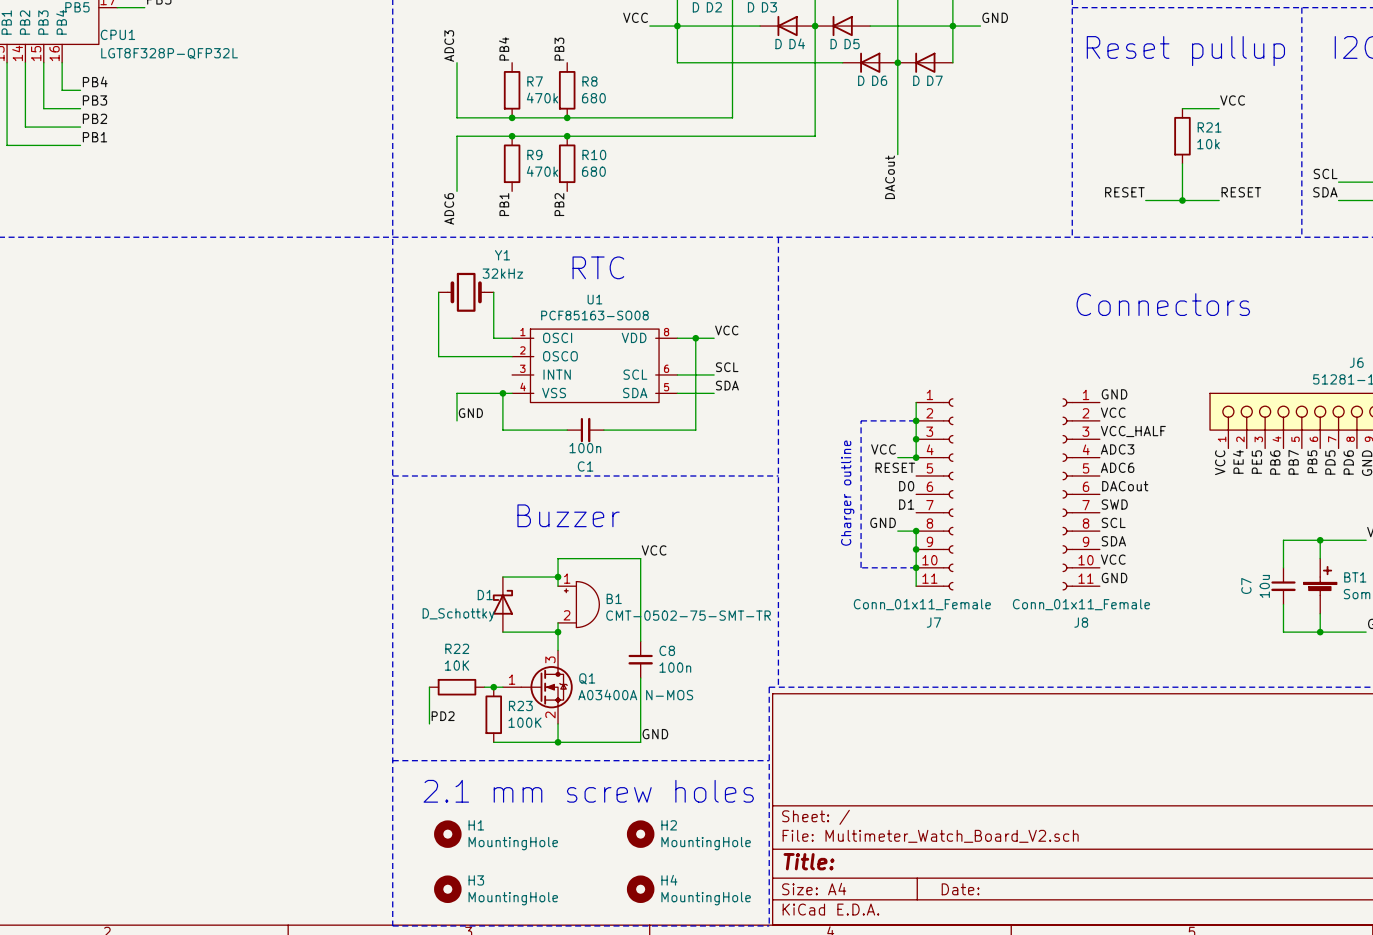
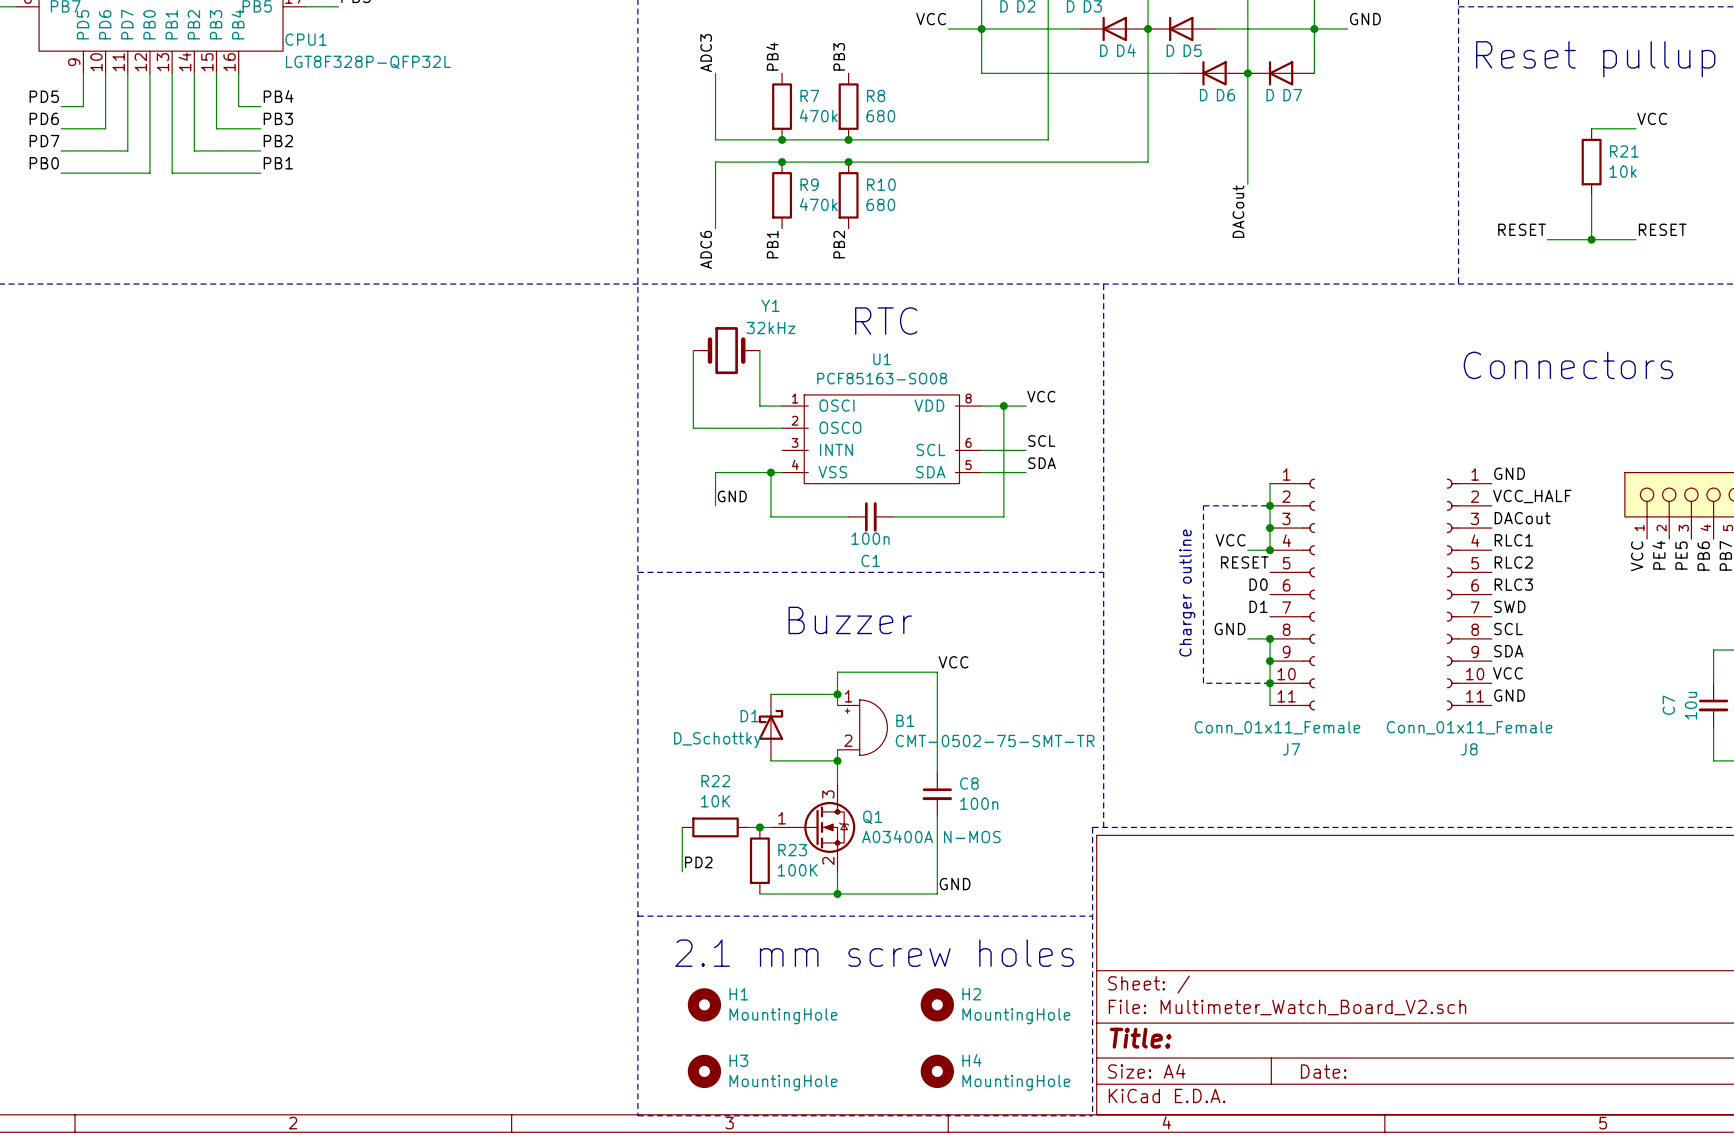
label: VCC (1113, 412) -> VCC_HALF (1532, 496)
label: VCC_HALF (1133, 431) -> DACout (1522, 518)
label: ADC3 (1117, 449) -> RLC1 (1513, 540)
label: ADC6 (1117, 467) -> RLC2 (1513, 562)
label: DACout (1125, 486) -> RLC3 (1513, 584)

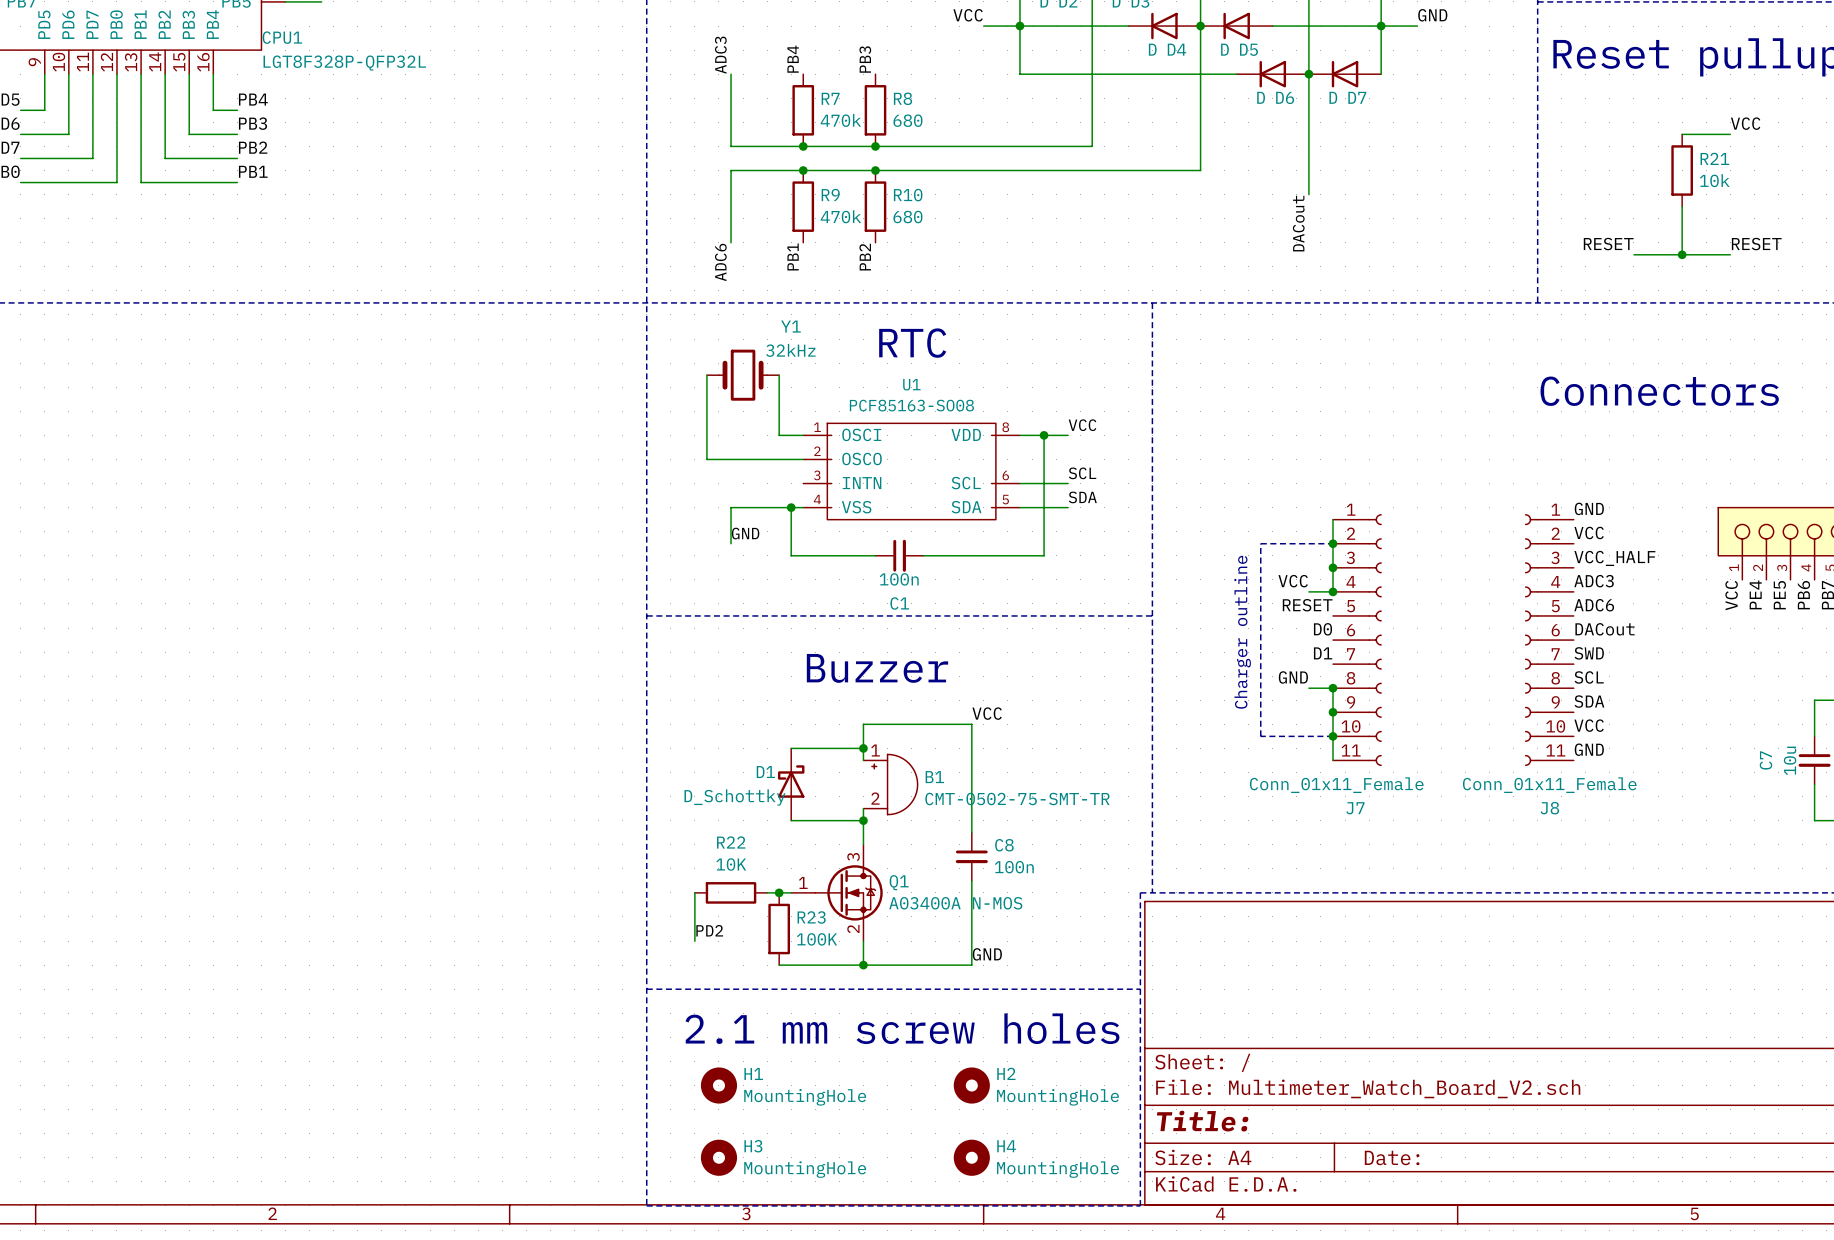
label: VCC_HALF (1532, 496) -> VCC (1589, 532)
label: DACout (1522, 518) -> VCC_HALF (1614, 558)
label: RLC1 (1513, 540) -> ADC3 (1594, 581)
label: RLC2 (1513, 562) -> ADC6 (1594, 605)
label: RLC3 (1513, 584) -> DACout (1605, 629)

